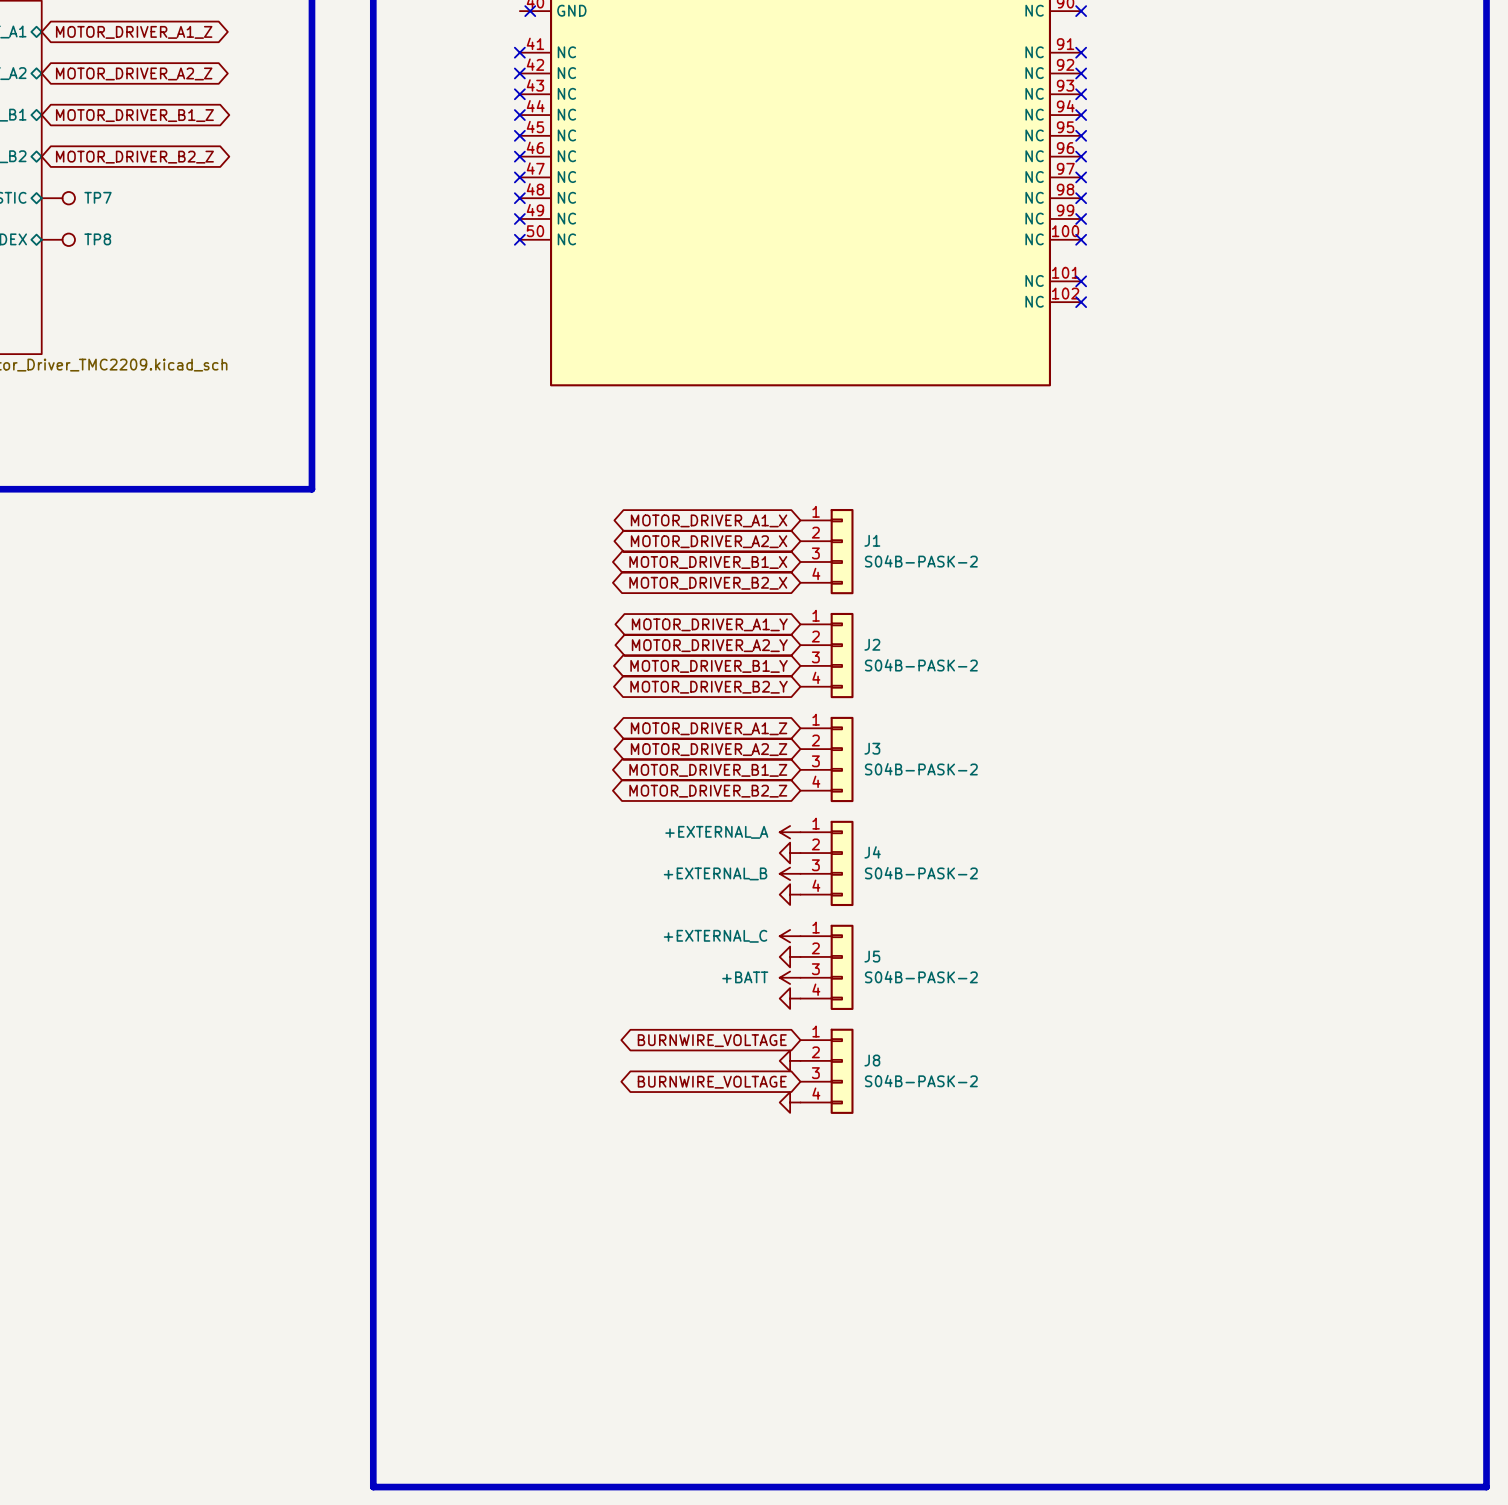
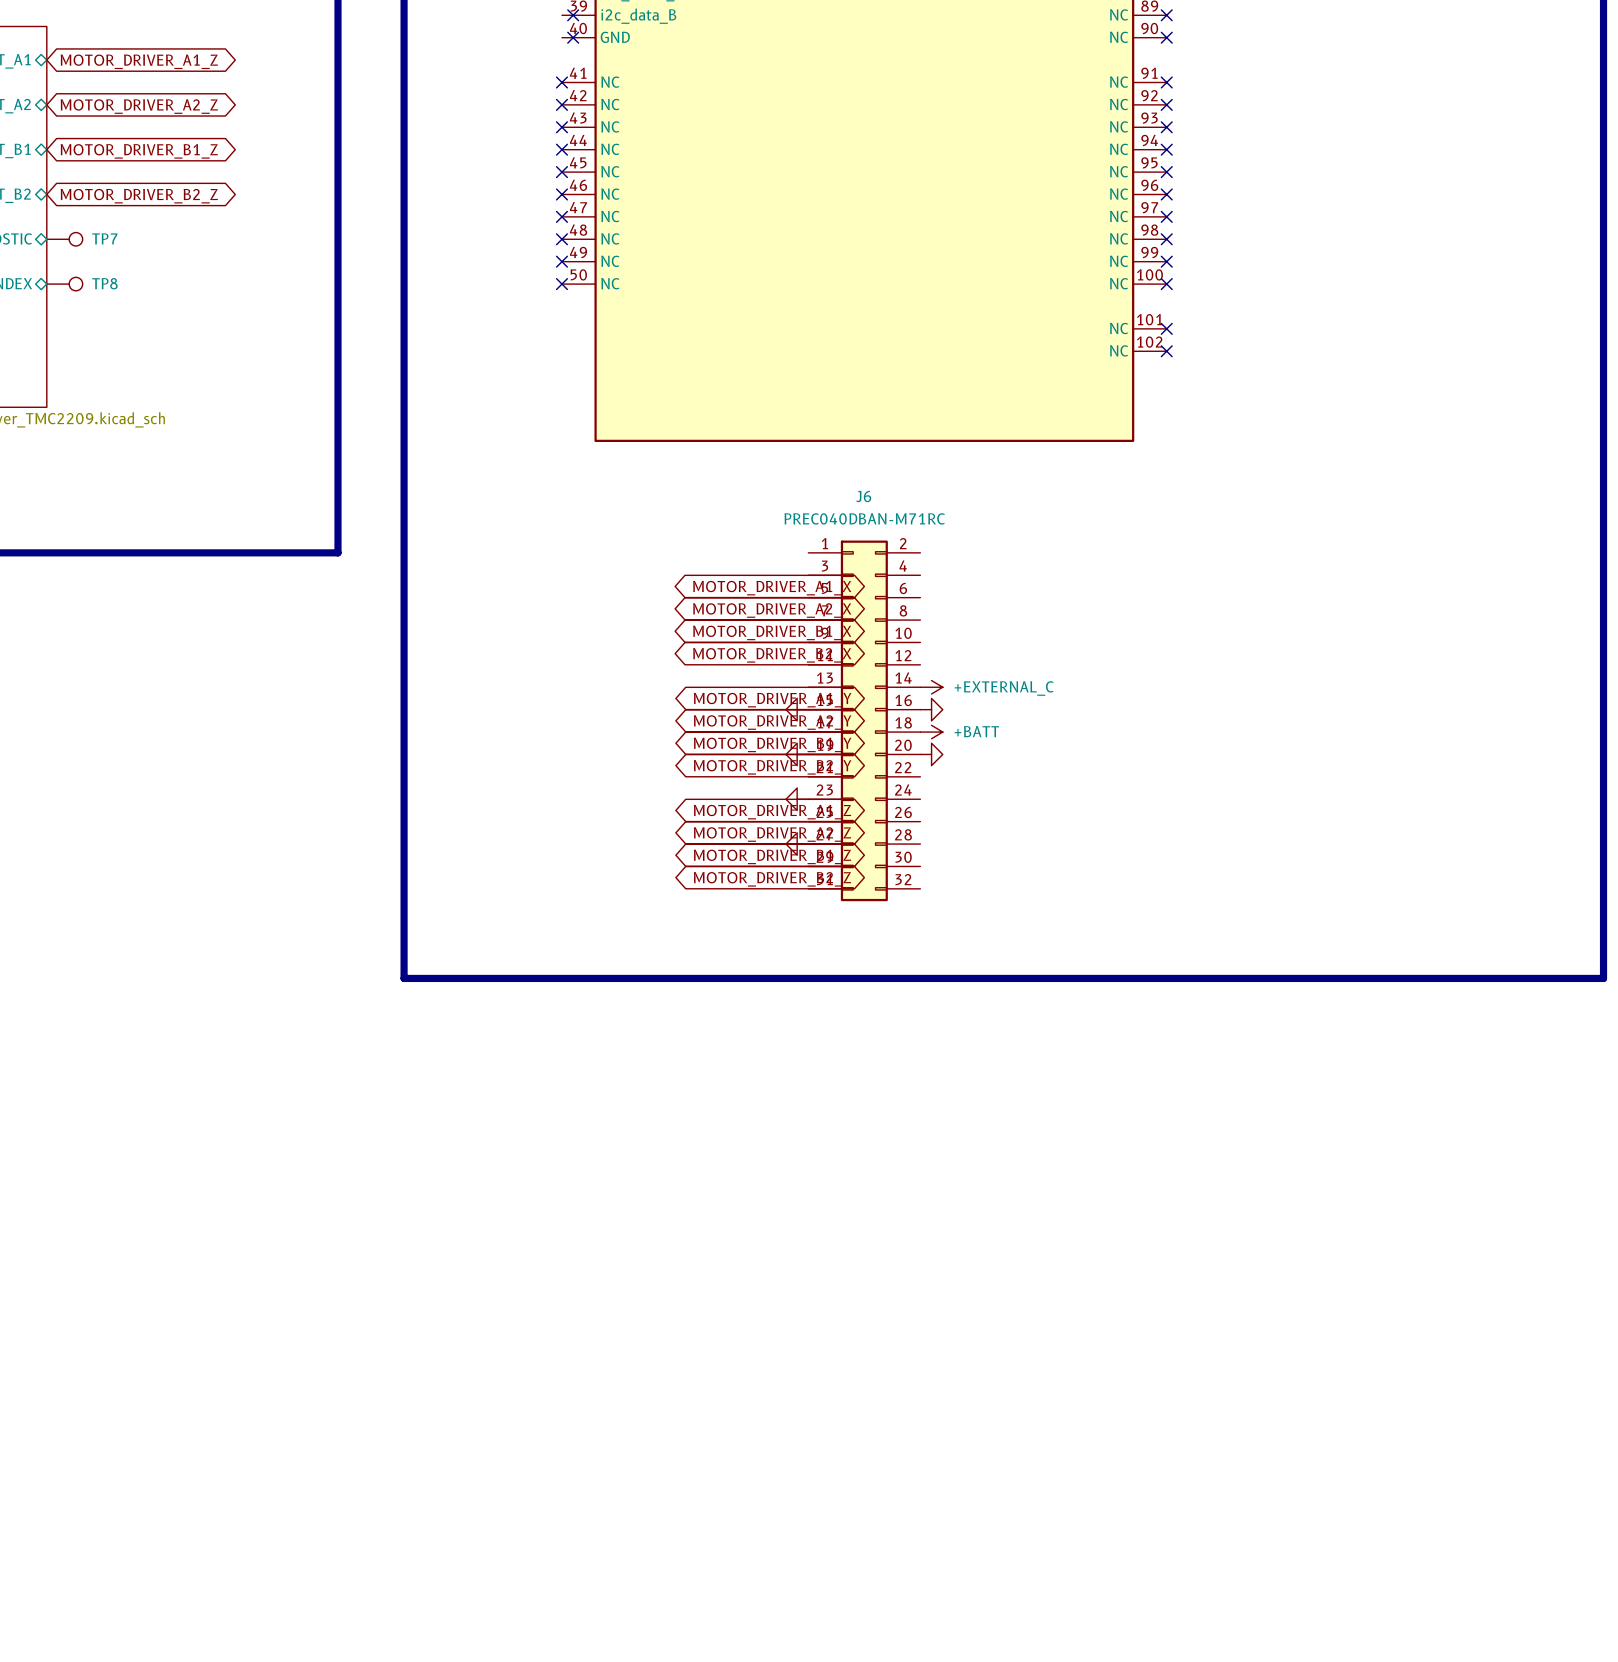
J1: S04B-PASK-2 (827, 551) -> none
power symbol: none -> +EXTERNAL_C (931, 687)
power symbol: none -> (797, 709)
power symbol: none -> (931, 709)
J6: none -> PREC040DBAN-M71RC (864, 720)
J2: S04B-PASK-2 (827, 655) -> none
power symbol: none -> +BATT (931, 732)
power symbol: none -> (797, 754)
power symbol: none -> (931, 754)
power symbol: none -> (797, 799)
power symbol: none -> (797, 844)
J3: S04B-PASK-2 (827, 759) -> none
power symbol: +EXTERNAL_A (790, 832) -> none
power symbol: (790, 853) -> none
J4: S04B-PASK-2 (827, 863) -> none
power symbol: +EXTERNAL_B (790, 873) -> none
line: (373, 884) (373, 1487) (1486, 1487) (1486, 884) -> (404, 978) (1603, 978)
power symbol: (790, 894) -> none
power symbol: +EXTERNAL_C (790, 936) -> none
power symbol: (790, 956) -> none
J5: S04B-PASK-2 (827, 967) -> none
power symbol: +BATT (790, 977) -> none
power symbol: (790, 998) -> none
global label: BURNWIRE_VOLTAGE (712, 1040) -> none
power symbol: (790, 1060) -> none
J8: S04B-PASK-2 (827, 1071) -> none
global label: BURNWIRE_VOLTAGE (712, 1082) -> none
power symbol: (790, 1102) -> none

